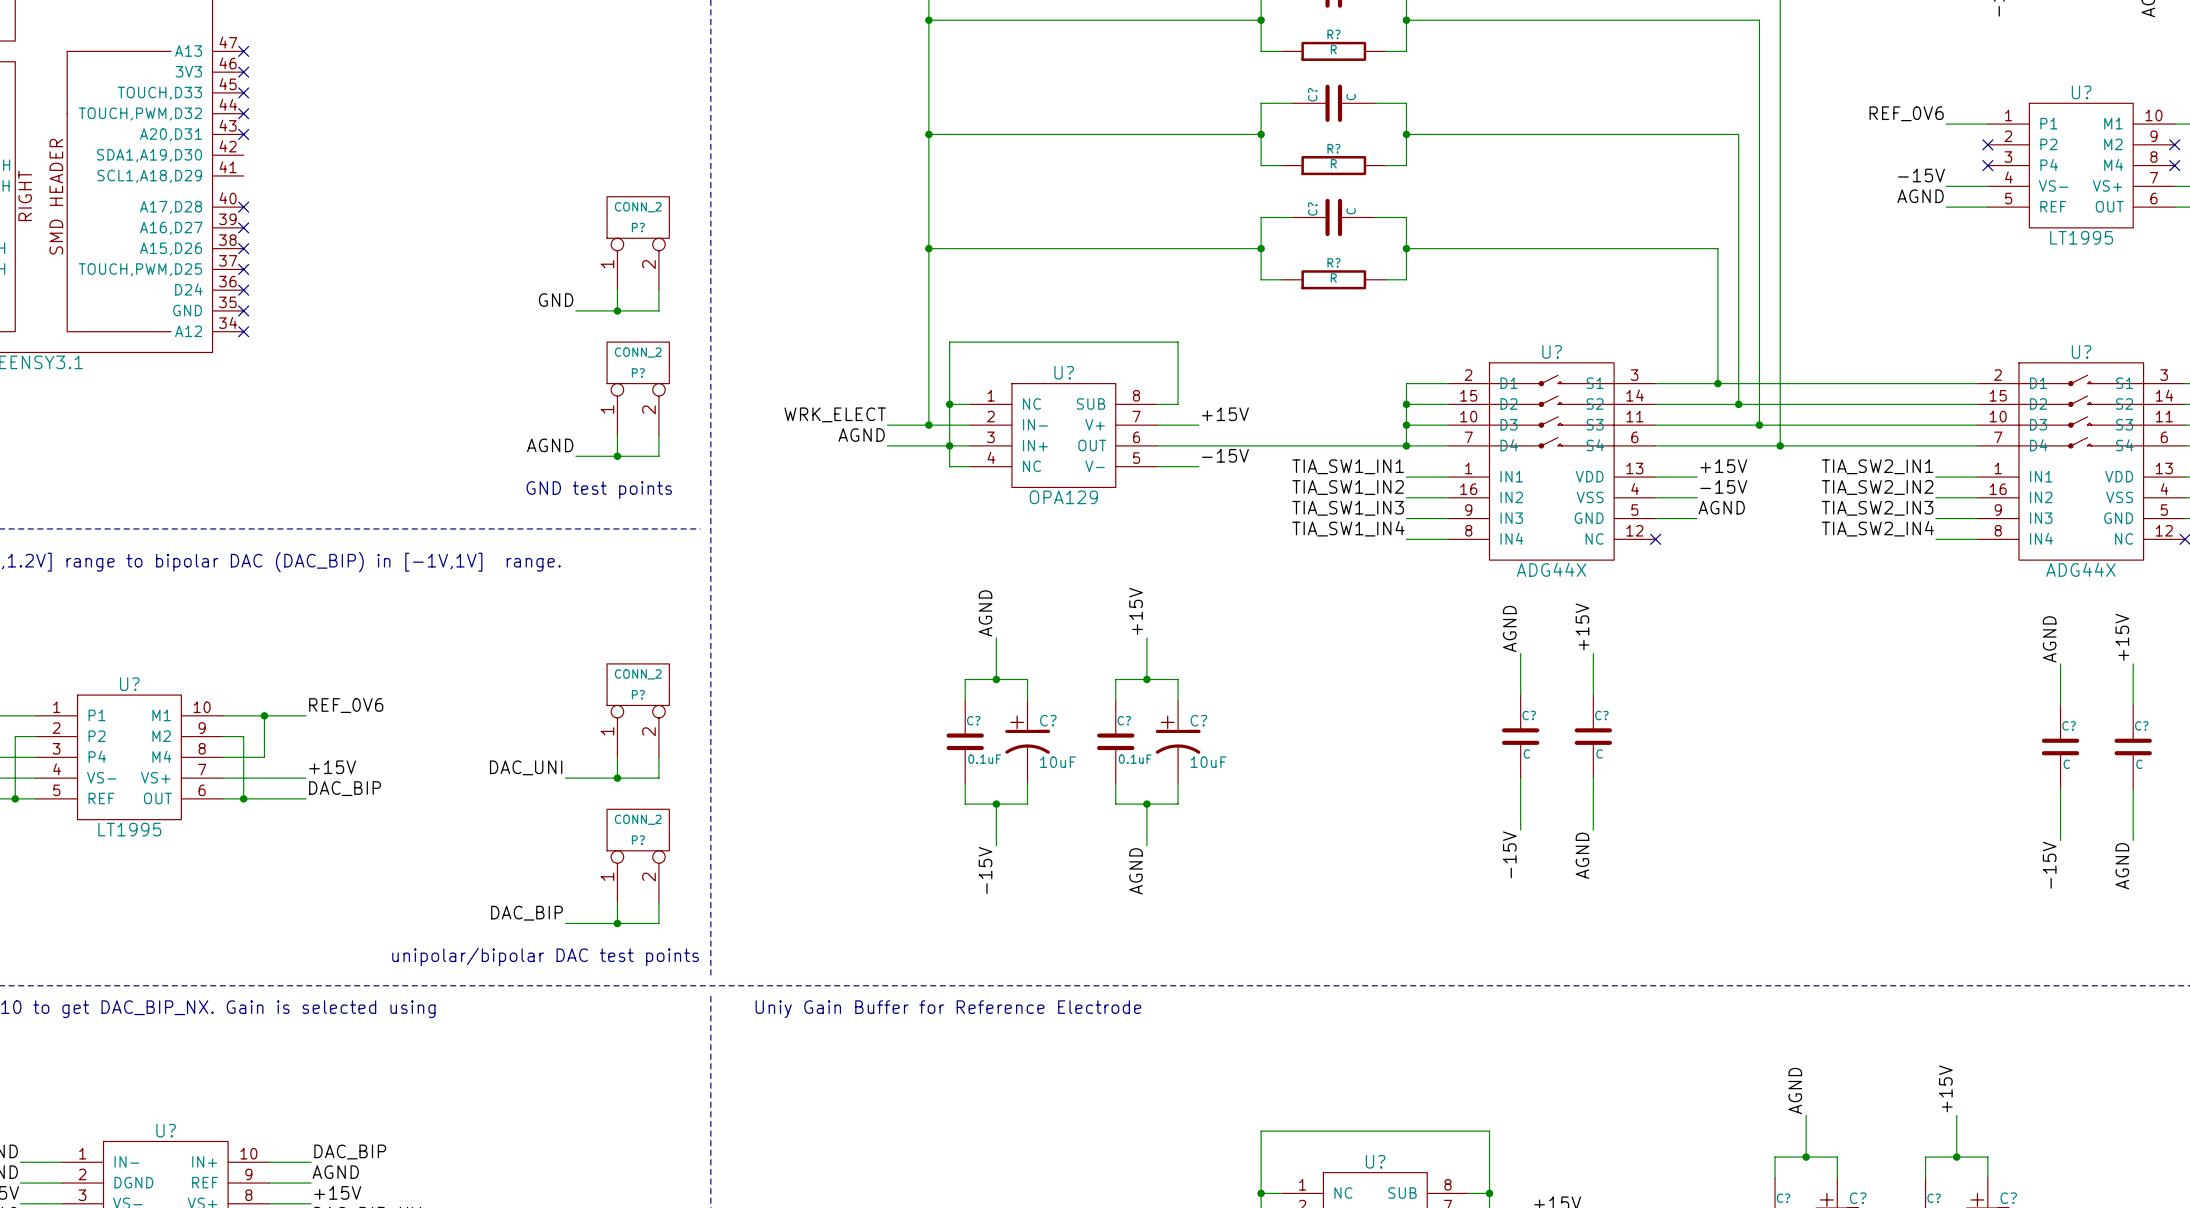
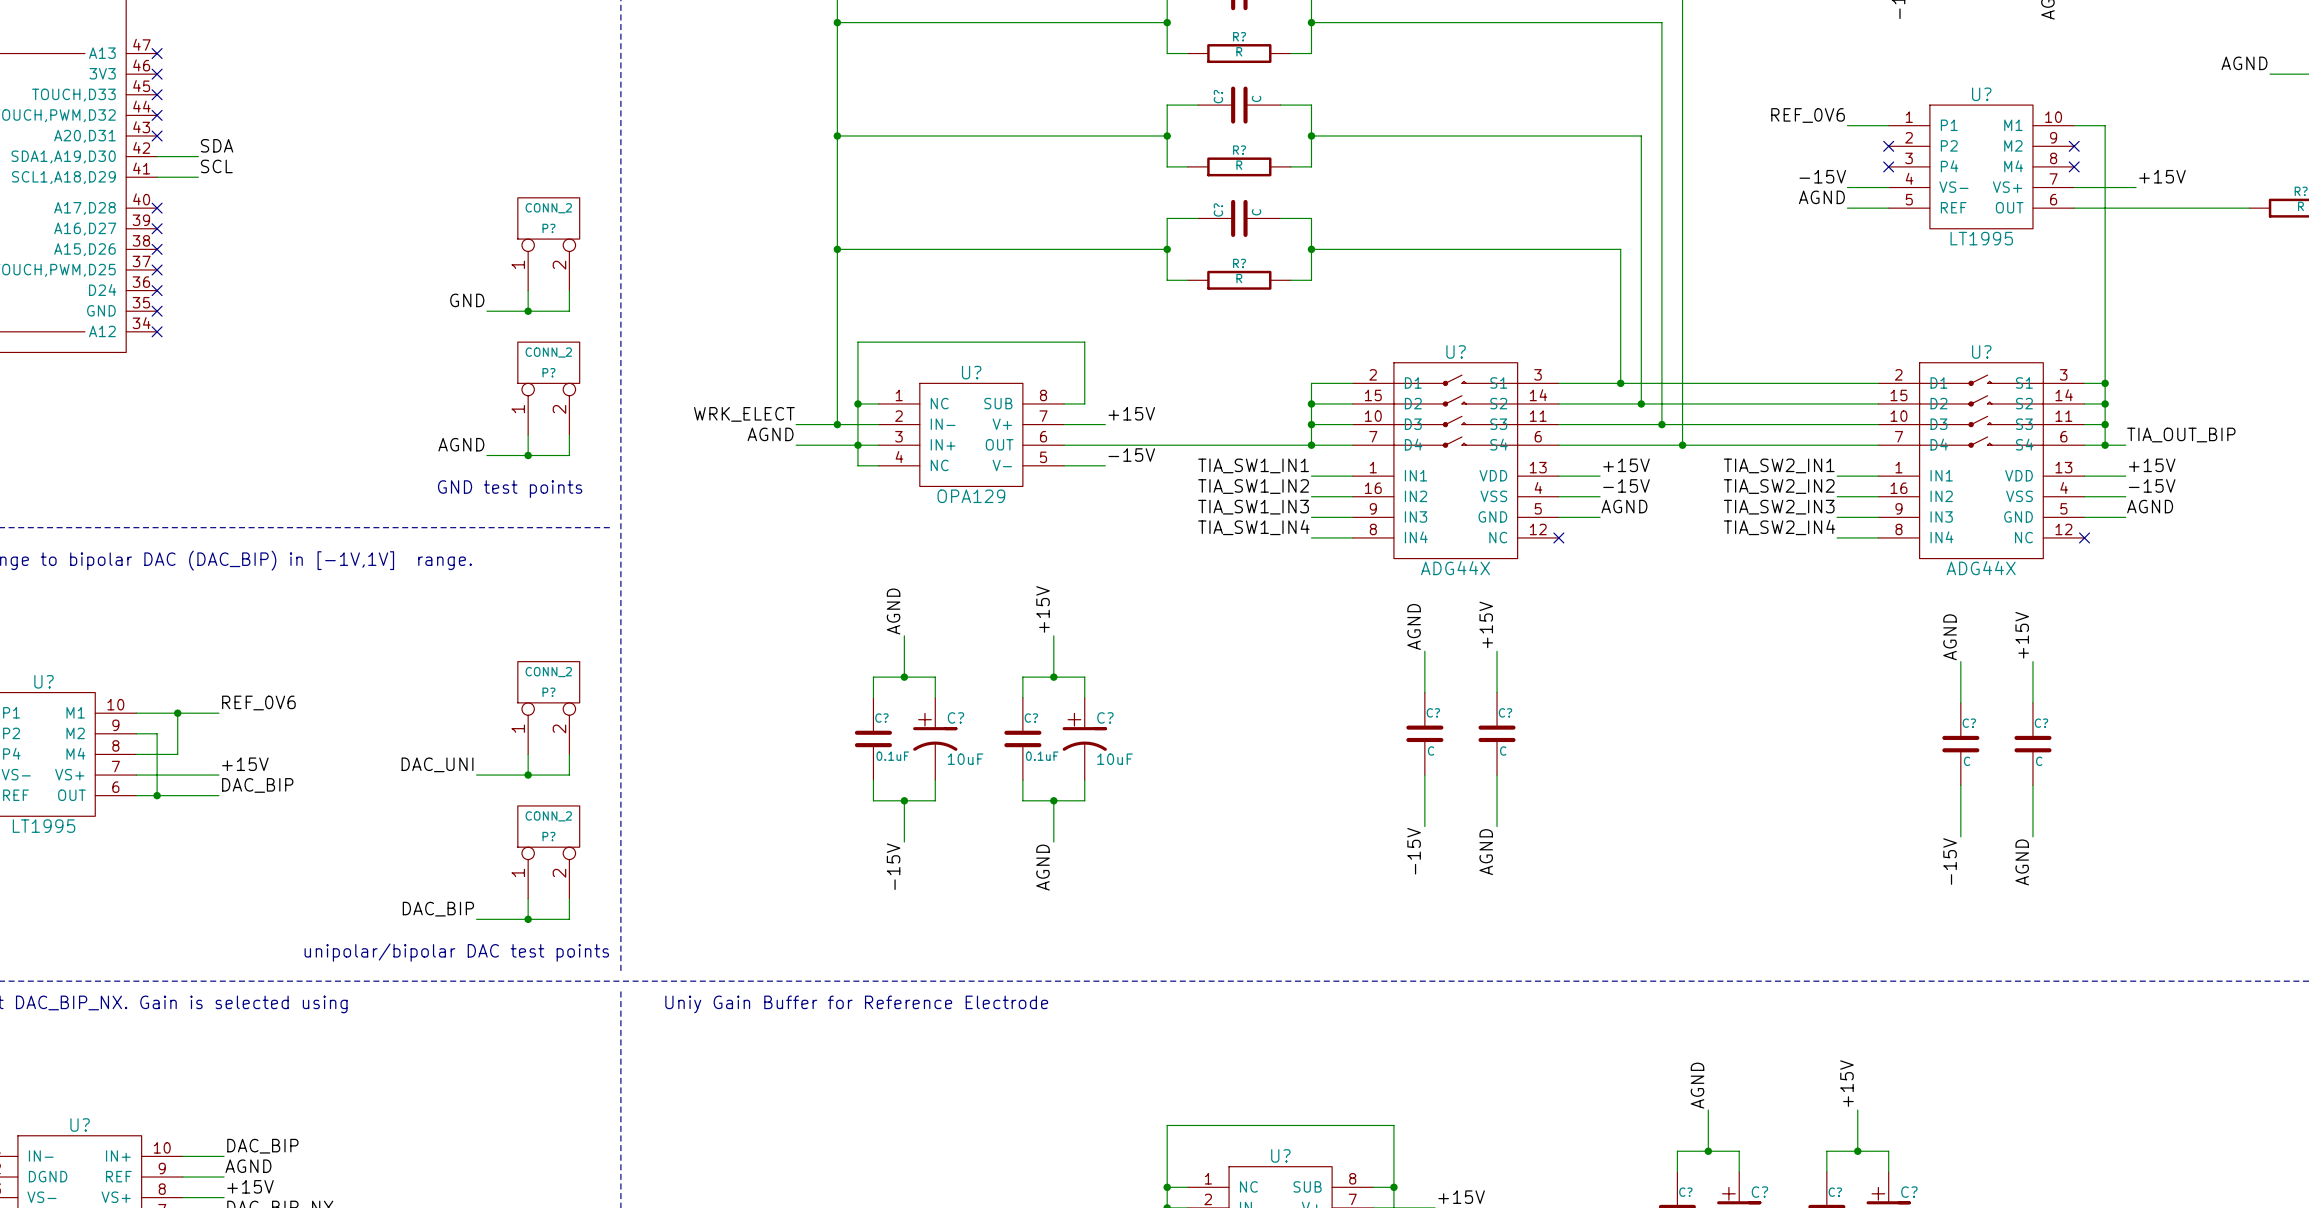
label: none -> SDA (217, 145)
wire: none -> (157, 156) (198, 156)
label: none -> SCL (216, 166)
wire: none -> (157, 177) (198, 177)

